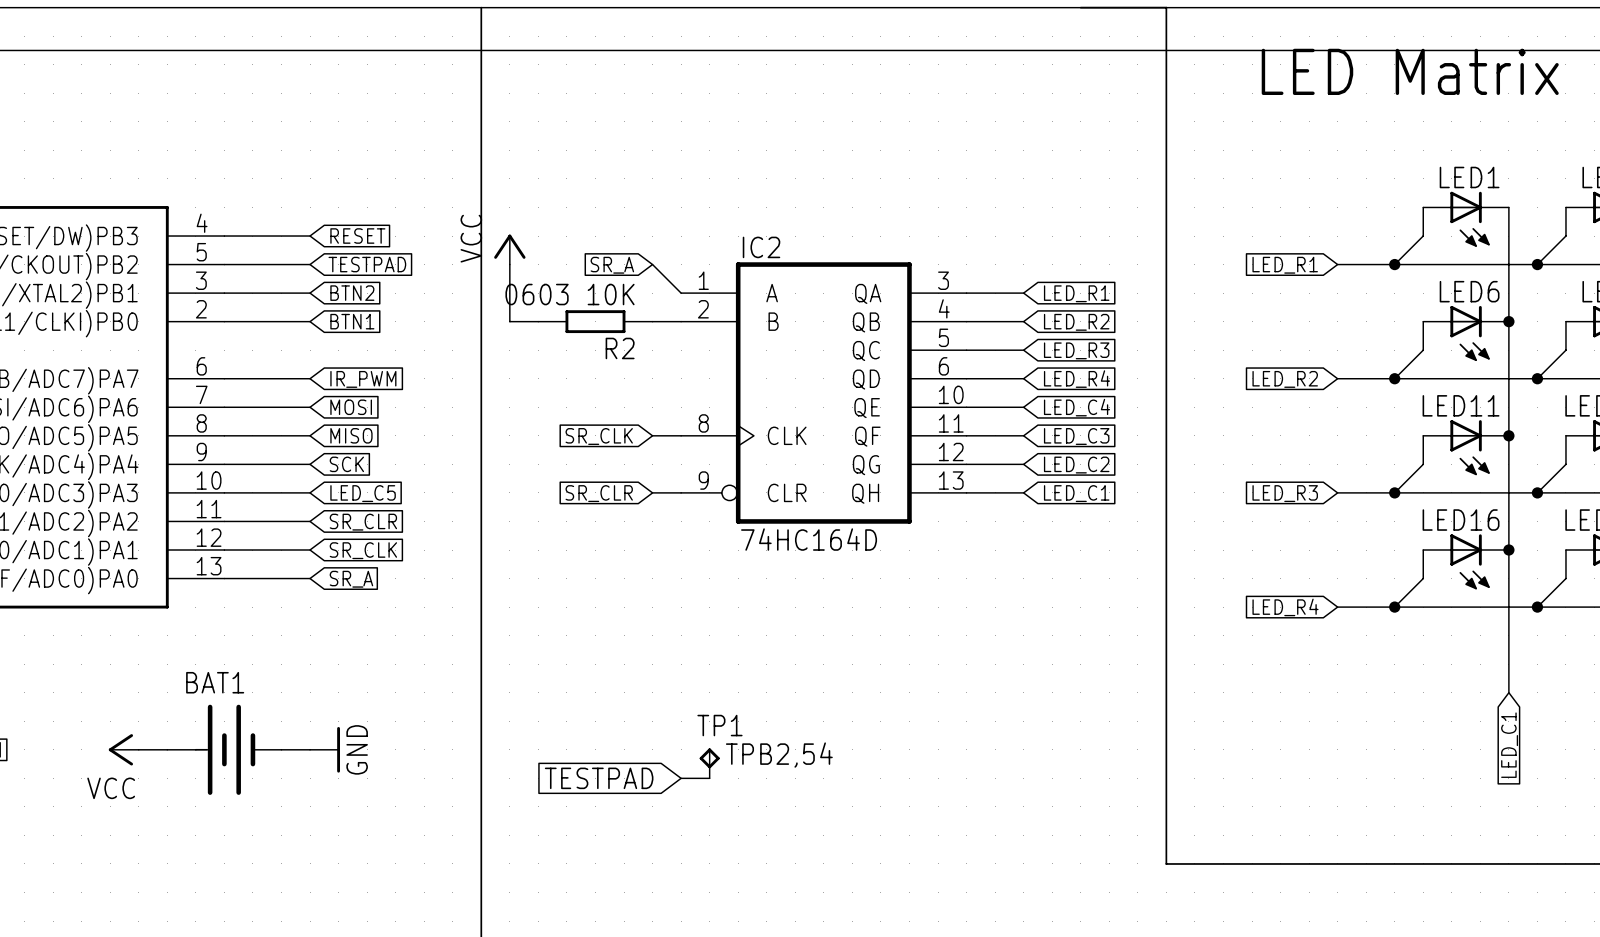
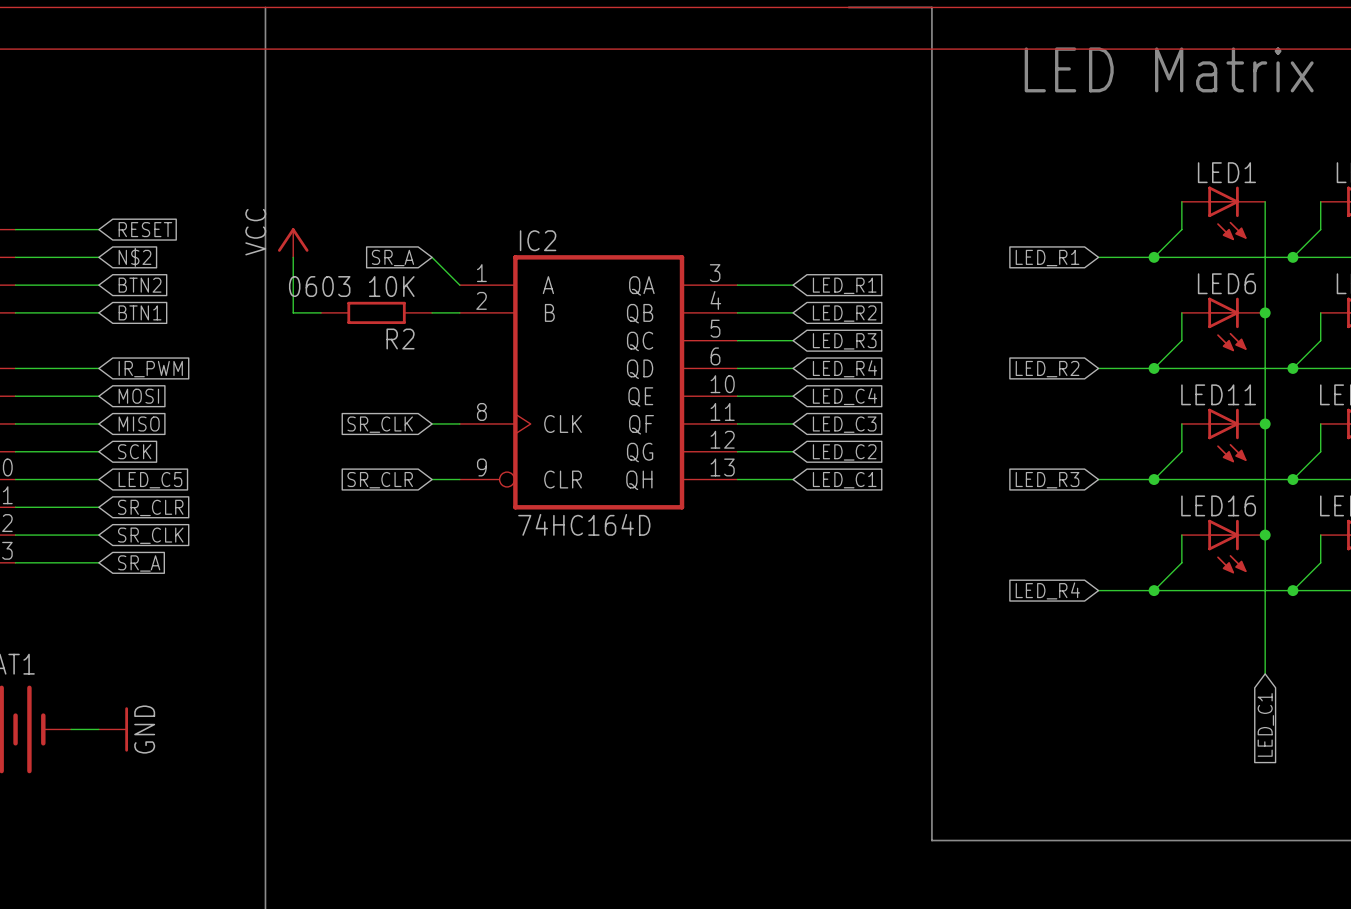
global label: TESTPAD (367, 264) -> N$2 (134, 257)
TP1: TPB2,54 (709, 763) -> none
global label: TESTPAD (599, 778) -> none
wire: (681, 778) (709, 778) -> none

